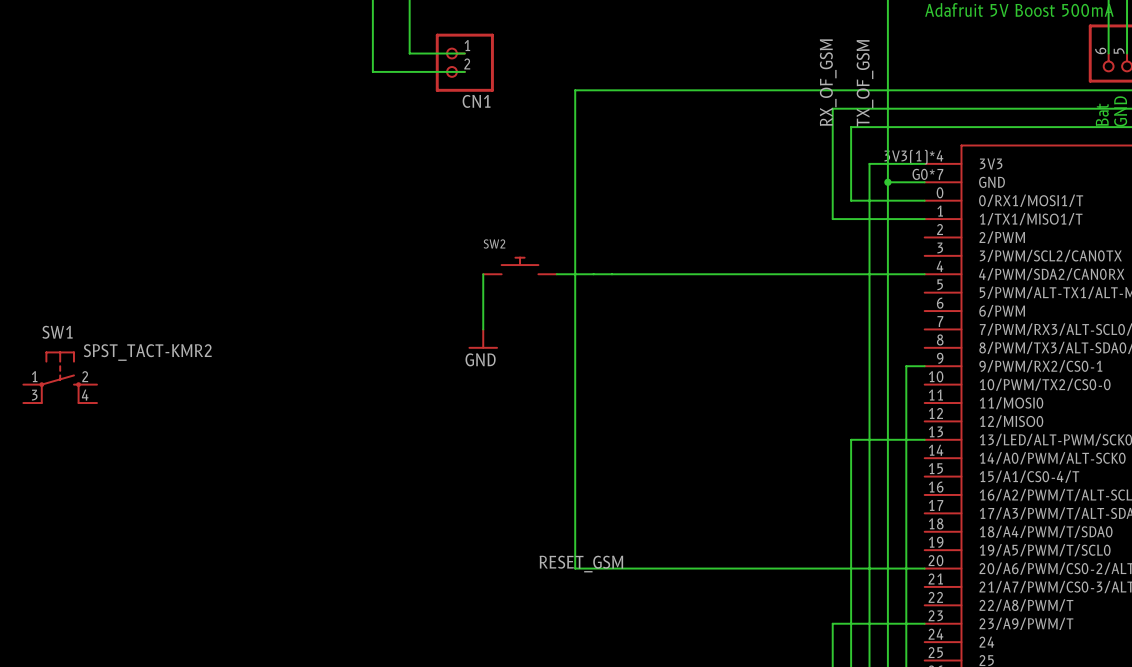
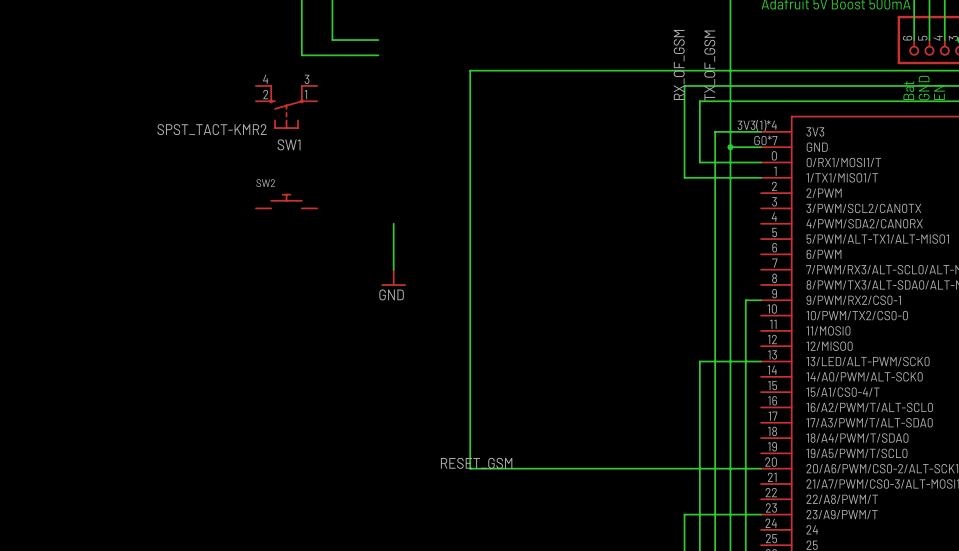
CN1: (464, 62) -> none
SW2 position: (520, 265) -> (286, 201)
wire: (556, 274) (924, 274) -> none
SW1 rotation: 0° (60, 377) -> 180° (286, 107)
SW1 position: (60, 377) -> (286, 107)

